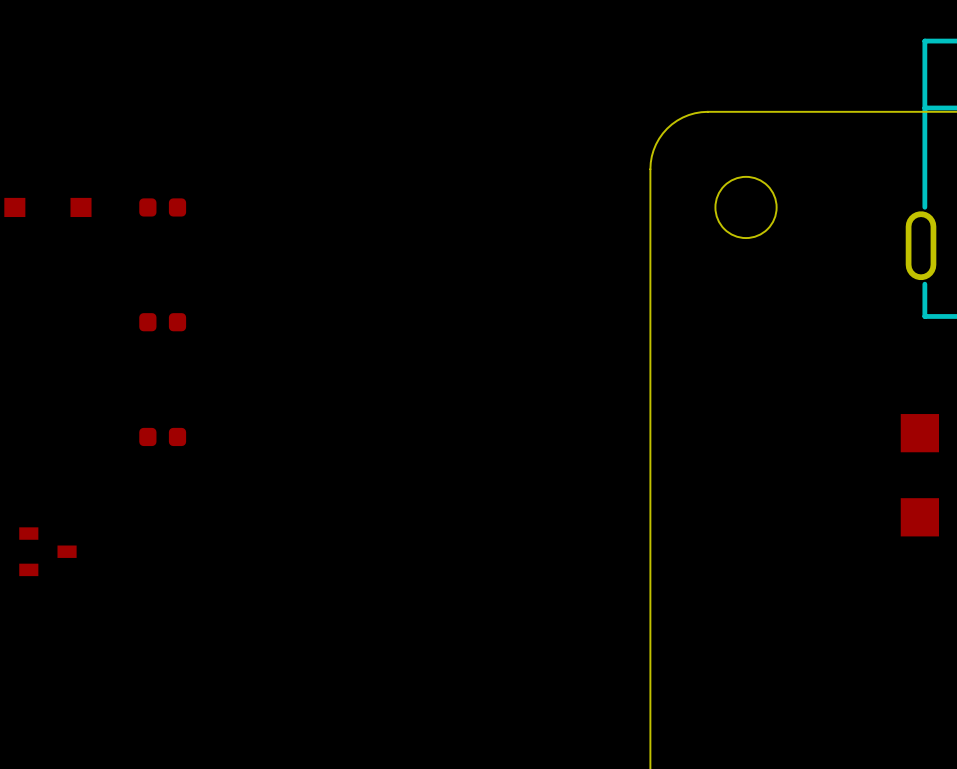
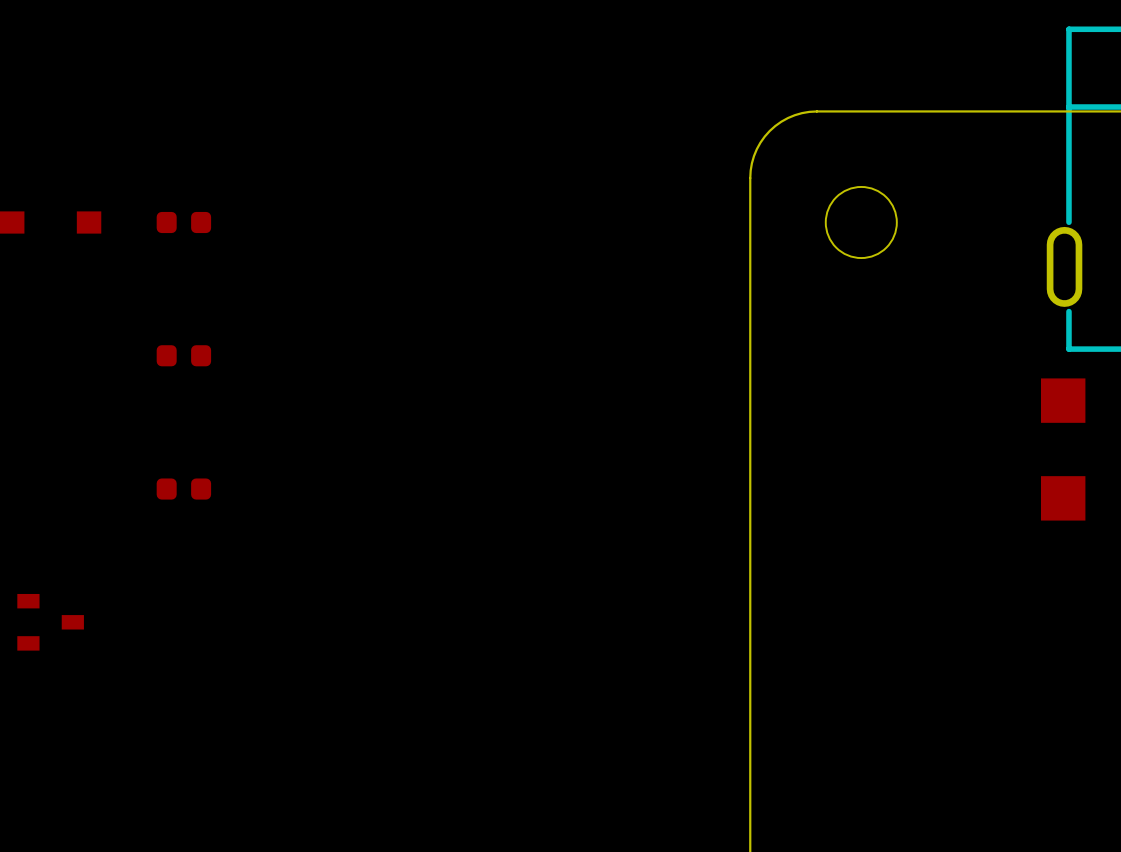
part position: (919, 475) -> (1063, 449)

